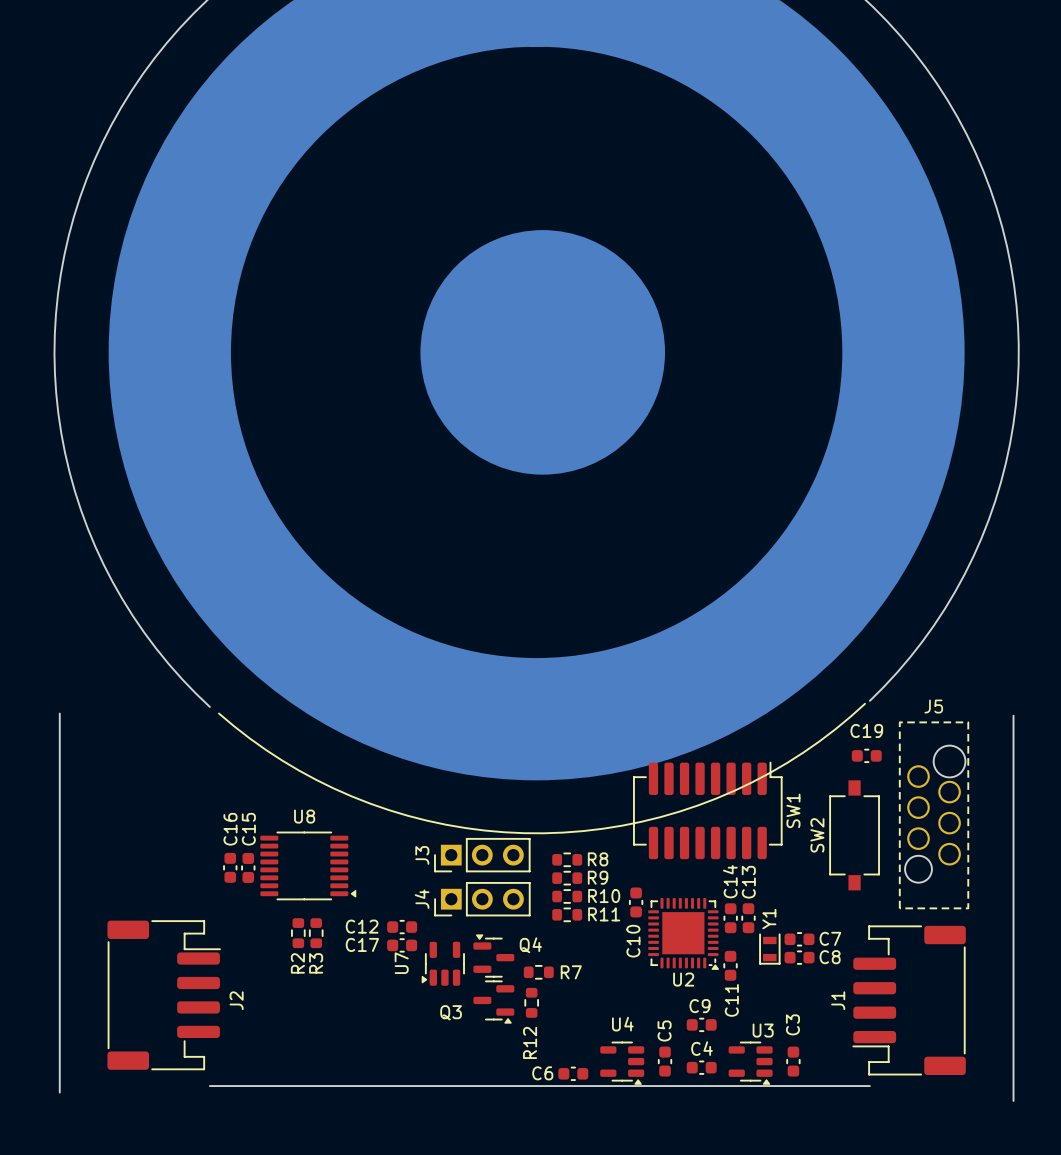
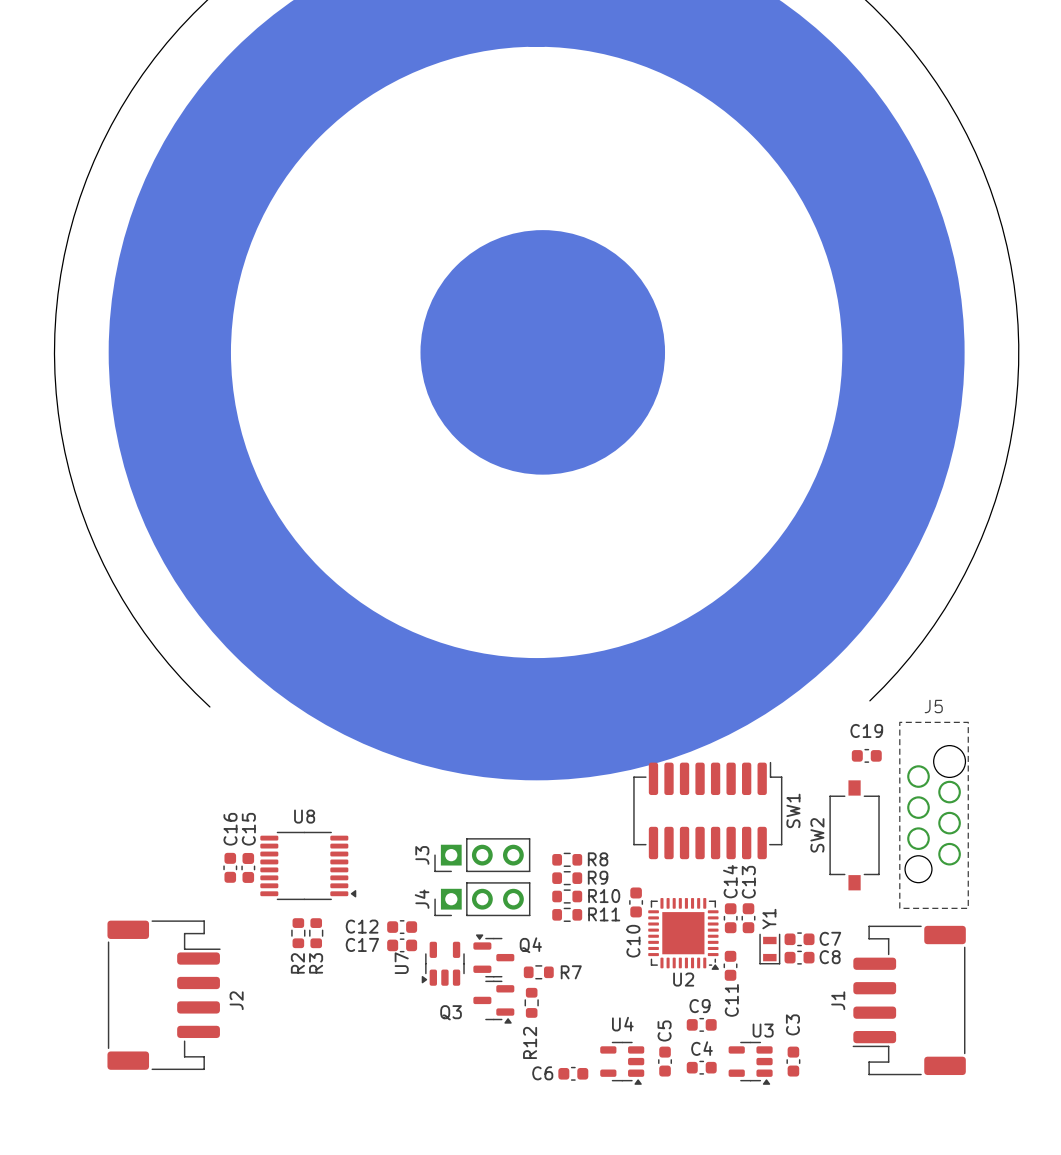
line: (865, 703) (819, 741) (786, 763) (752, 782) (716, 798) (679, 811) (641, 821) (583, 831) (543, 833) (504, 832) (446, 824) (407, 815) (370, 803) (333, 788) (282, 760) (249, 738) (219, 713) -> none
board edge: (59, 713) (59, 1092) -> none
board edge: (1013, 715) (1013, 1100) -> none
board edge: (209, 1086) (869, 1086) -> none

